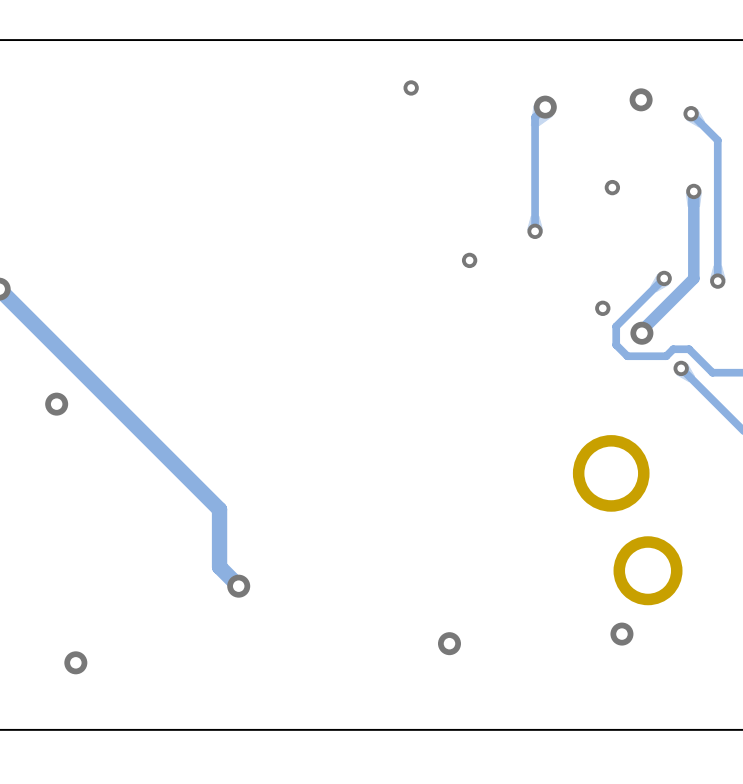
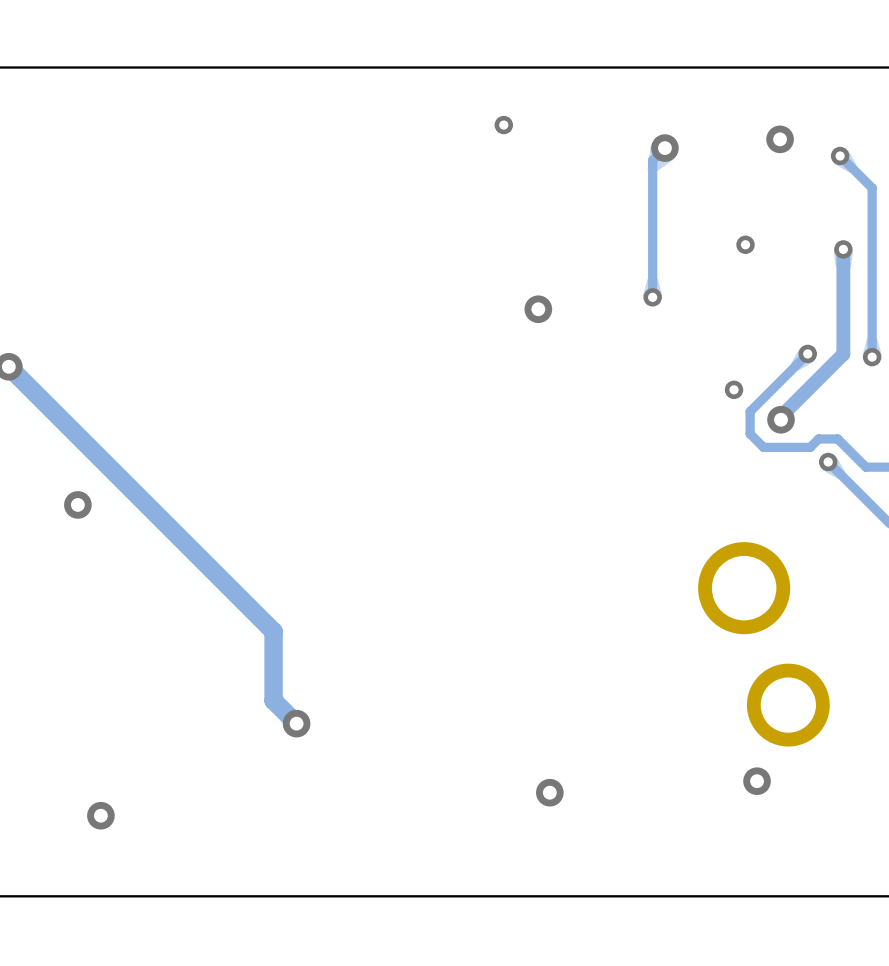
via: none -> (538, 309)
via: (469, 260) -> none

